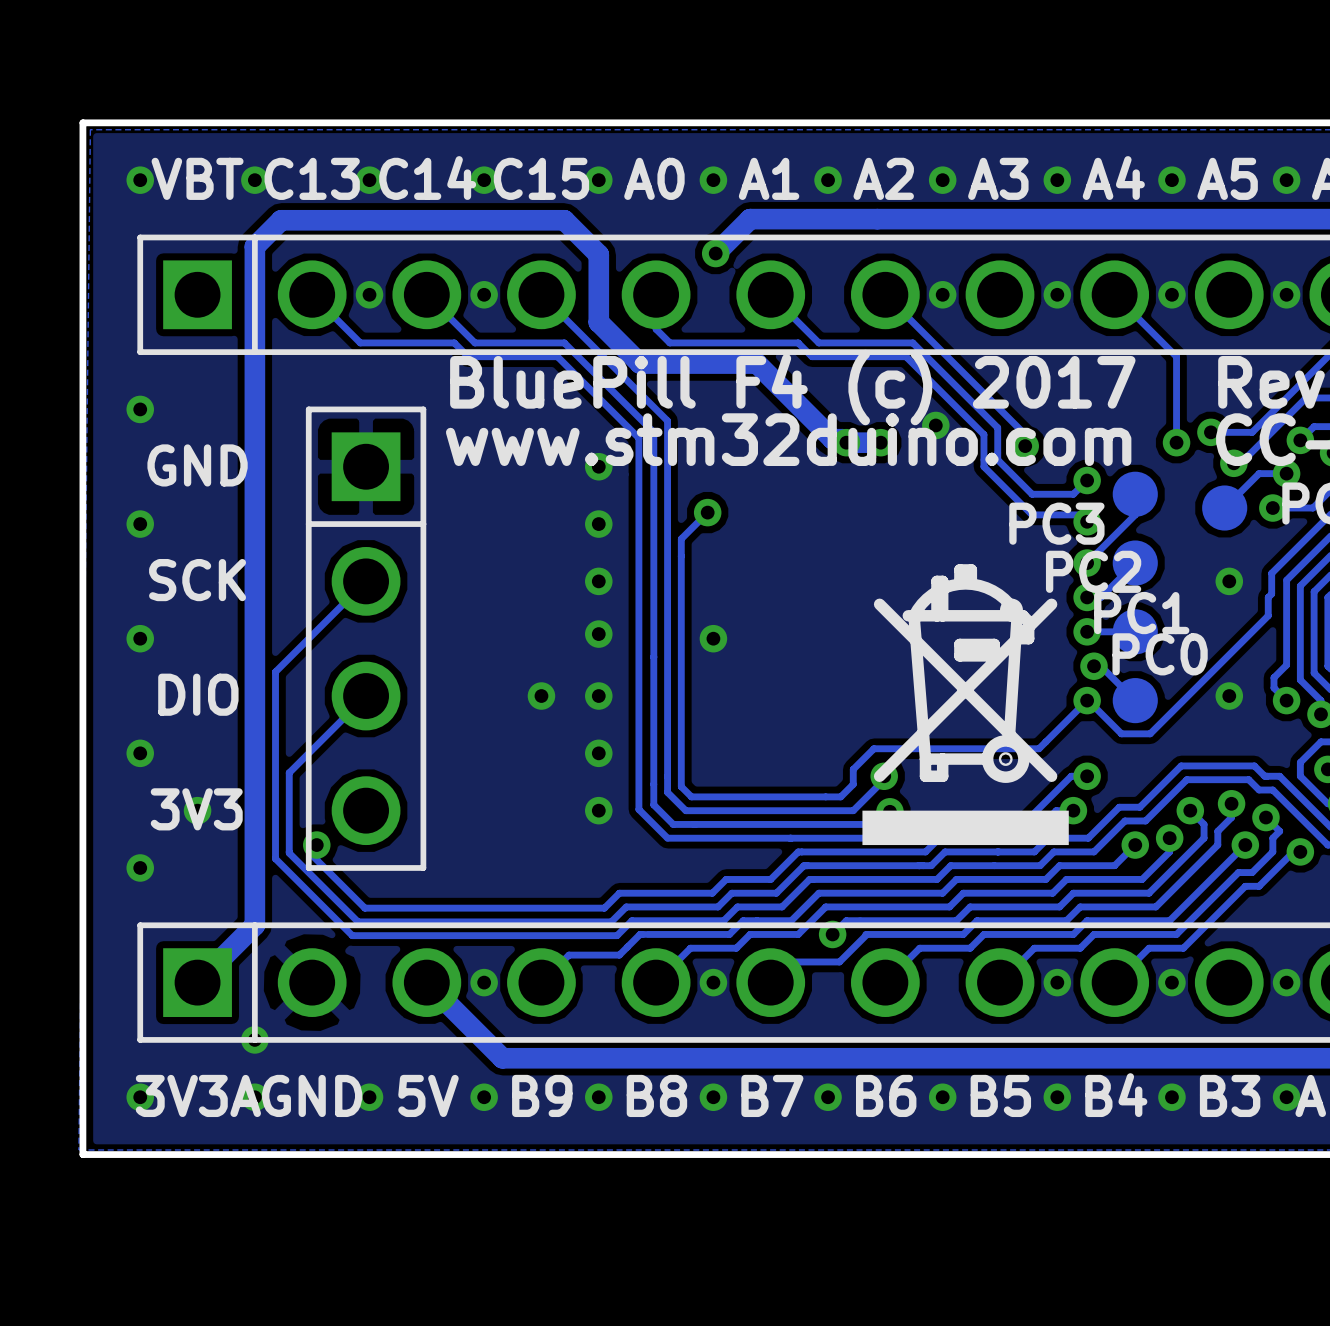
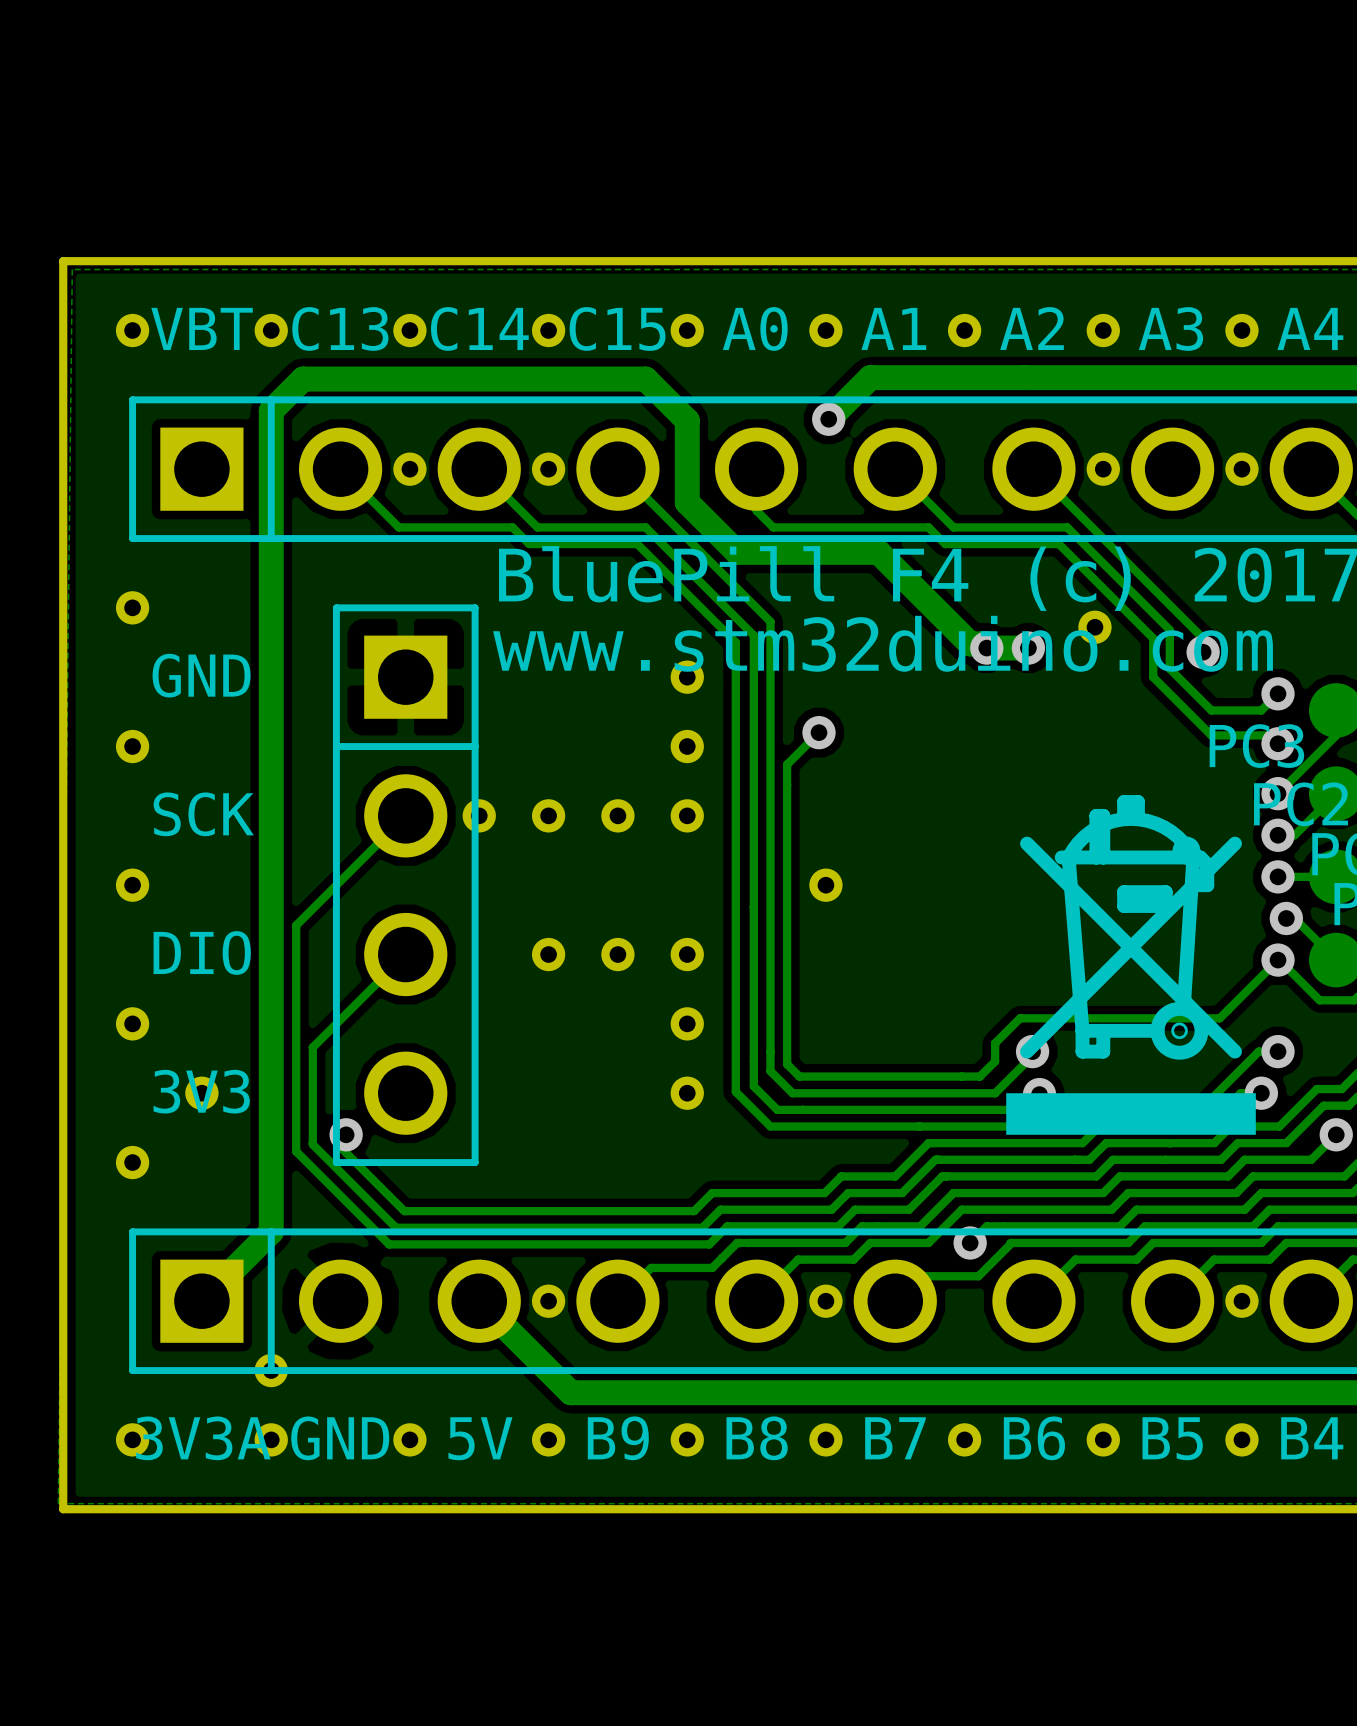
part: none -> (479, 815)
part: none -> (548, 815)
part: none -> (617, 815)
part: (598, 634) -> none
part: none -> (548, 954)

